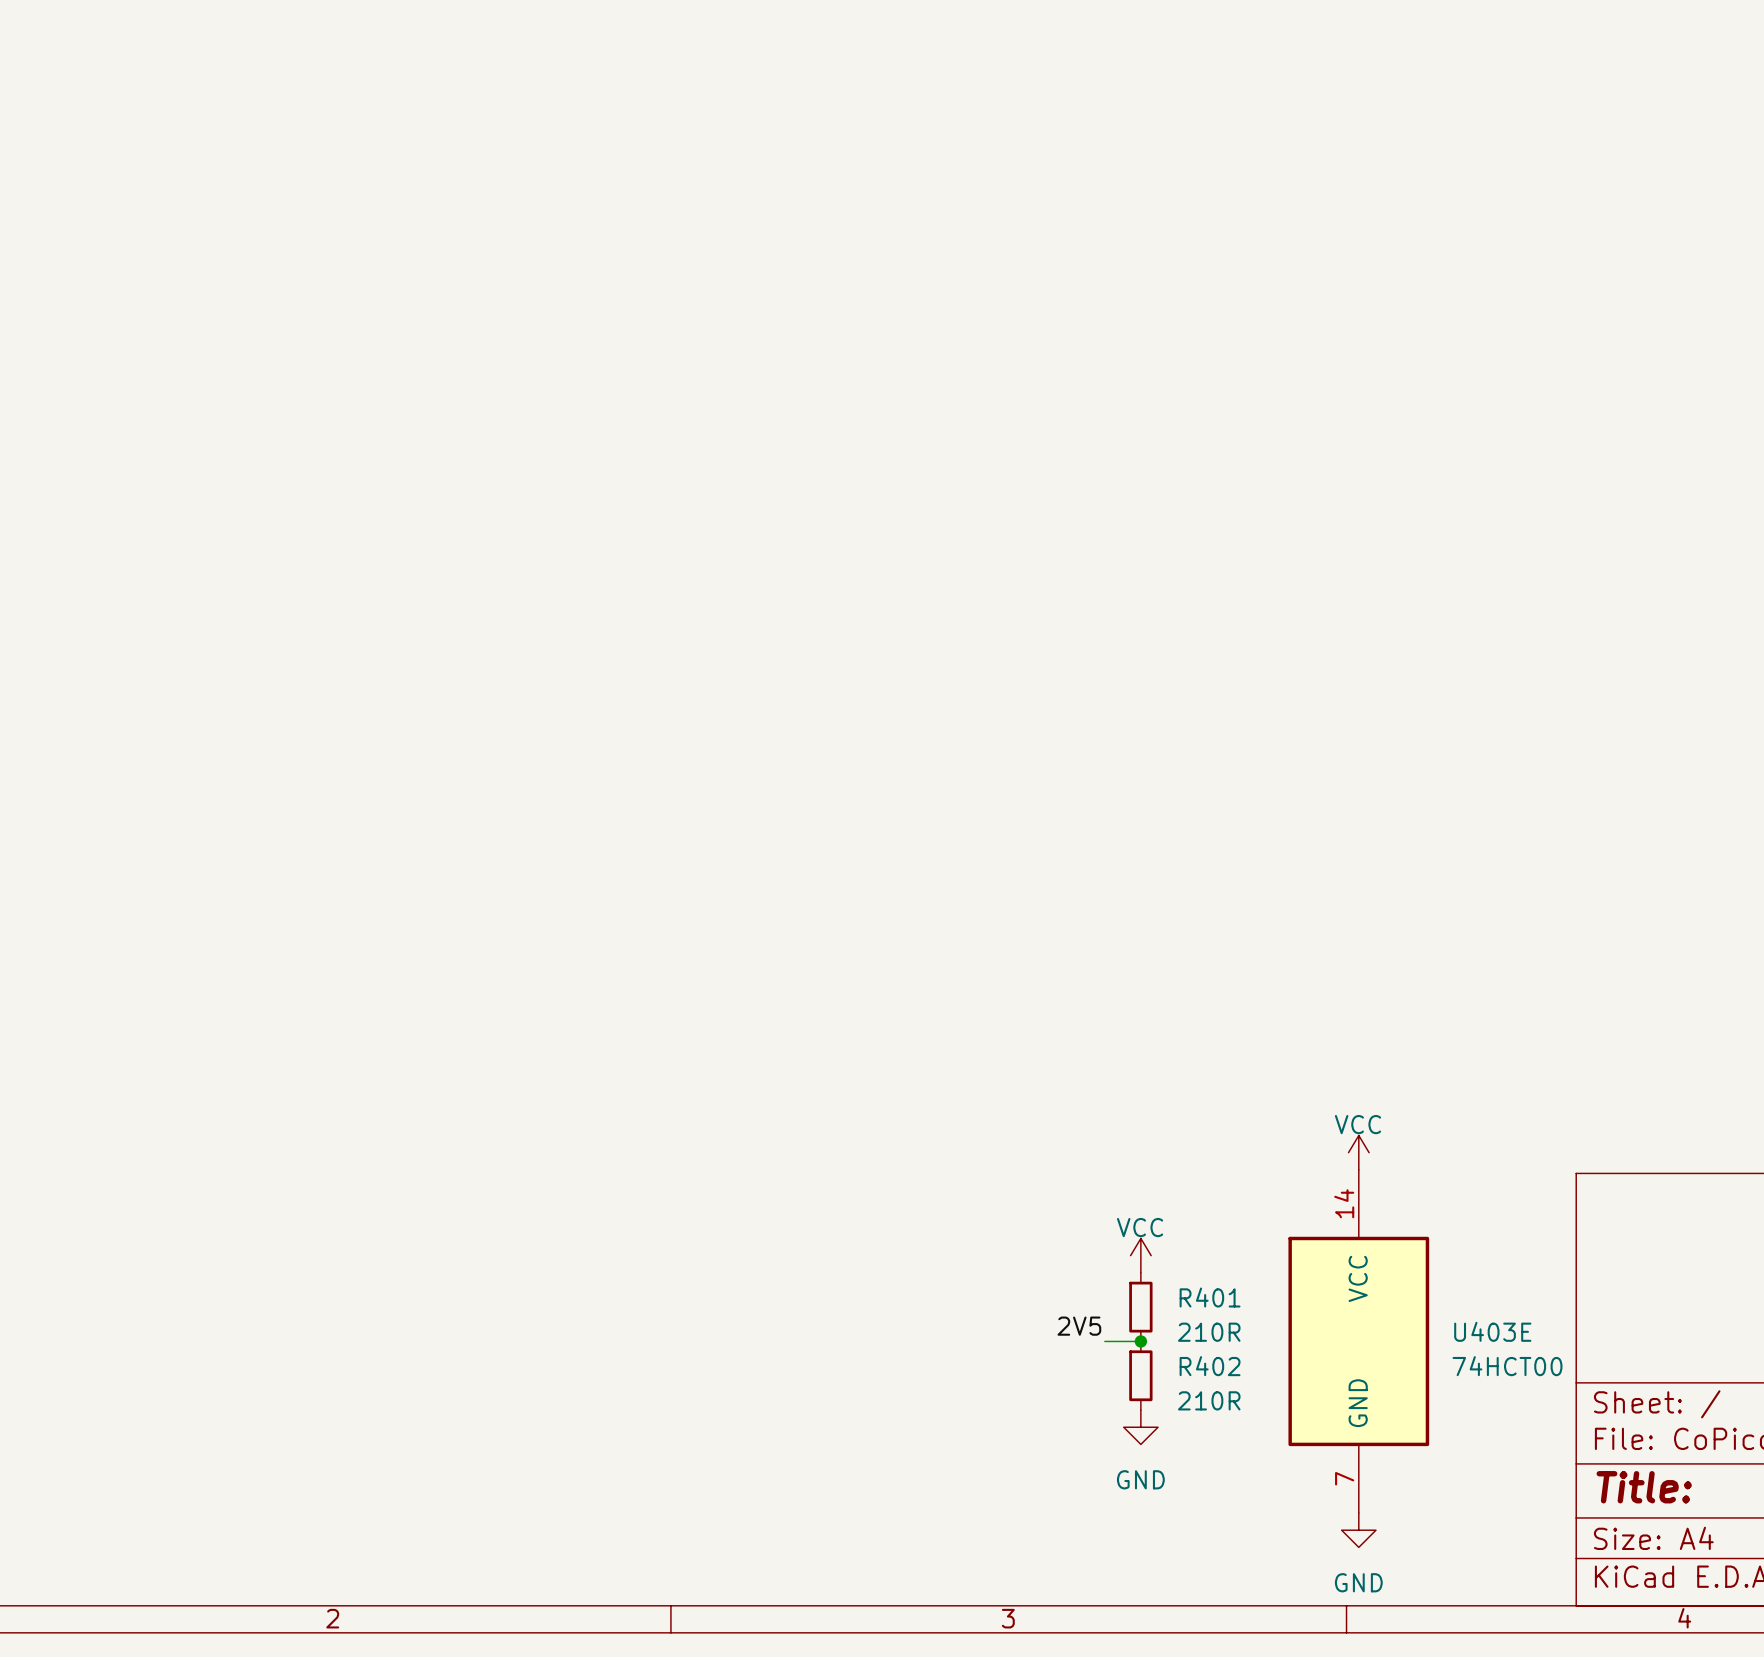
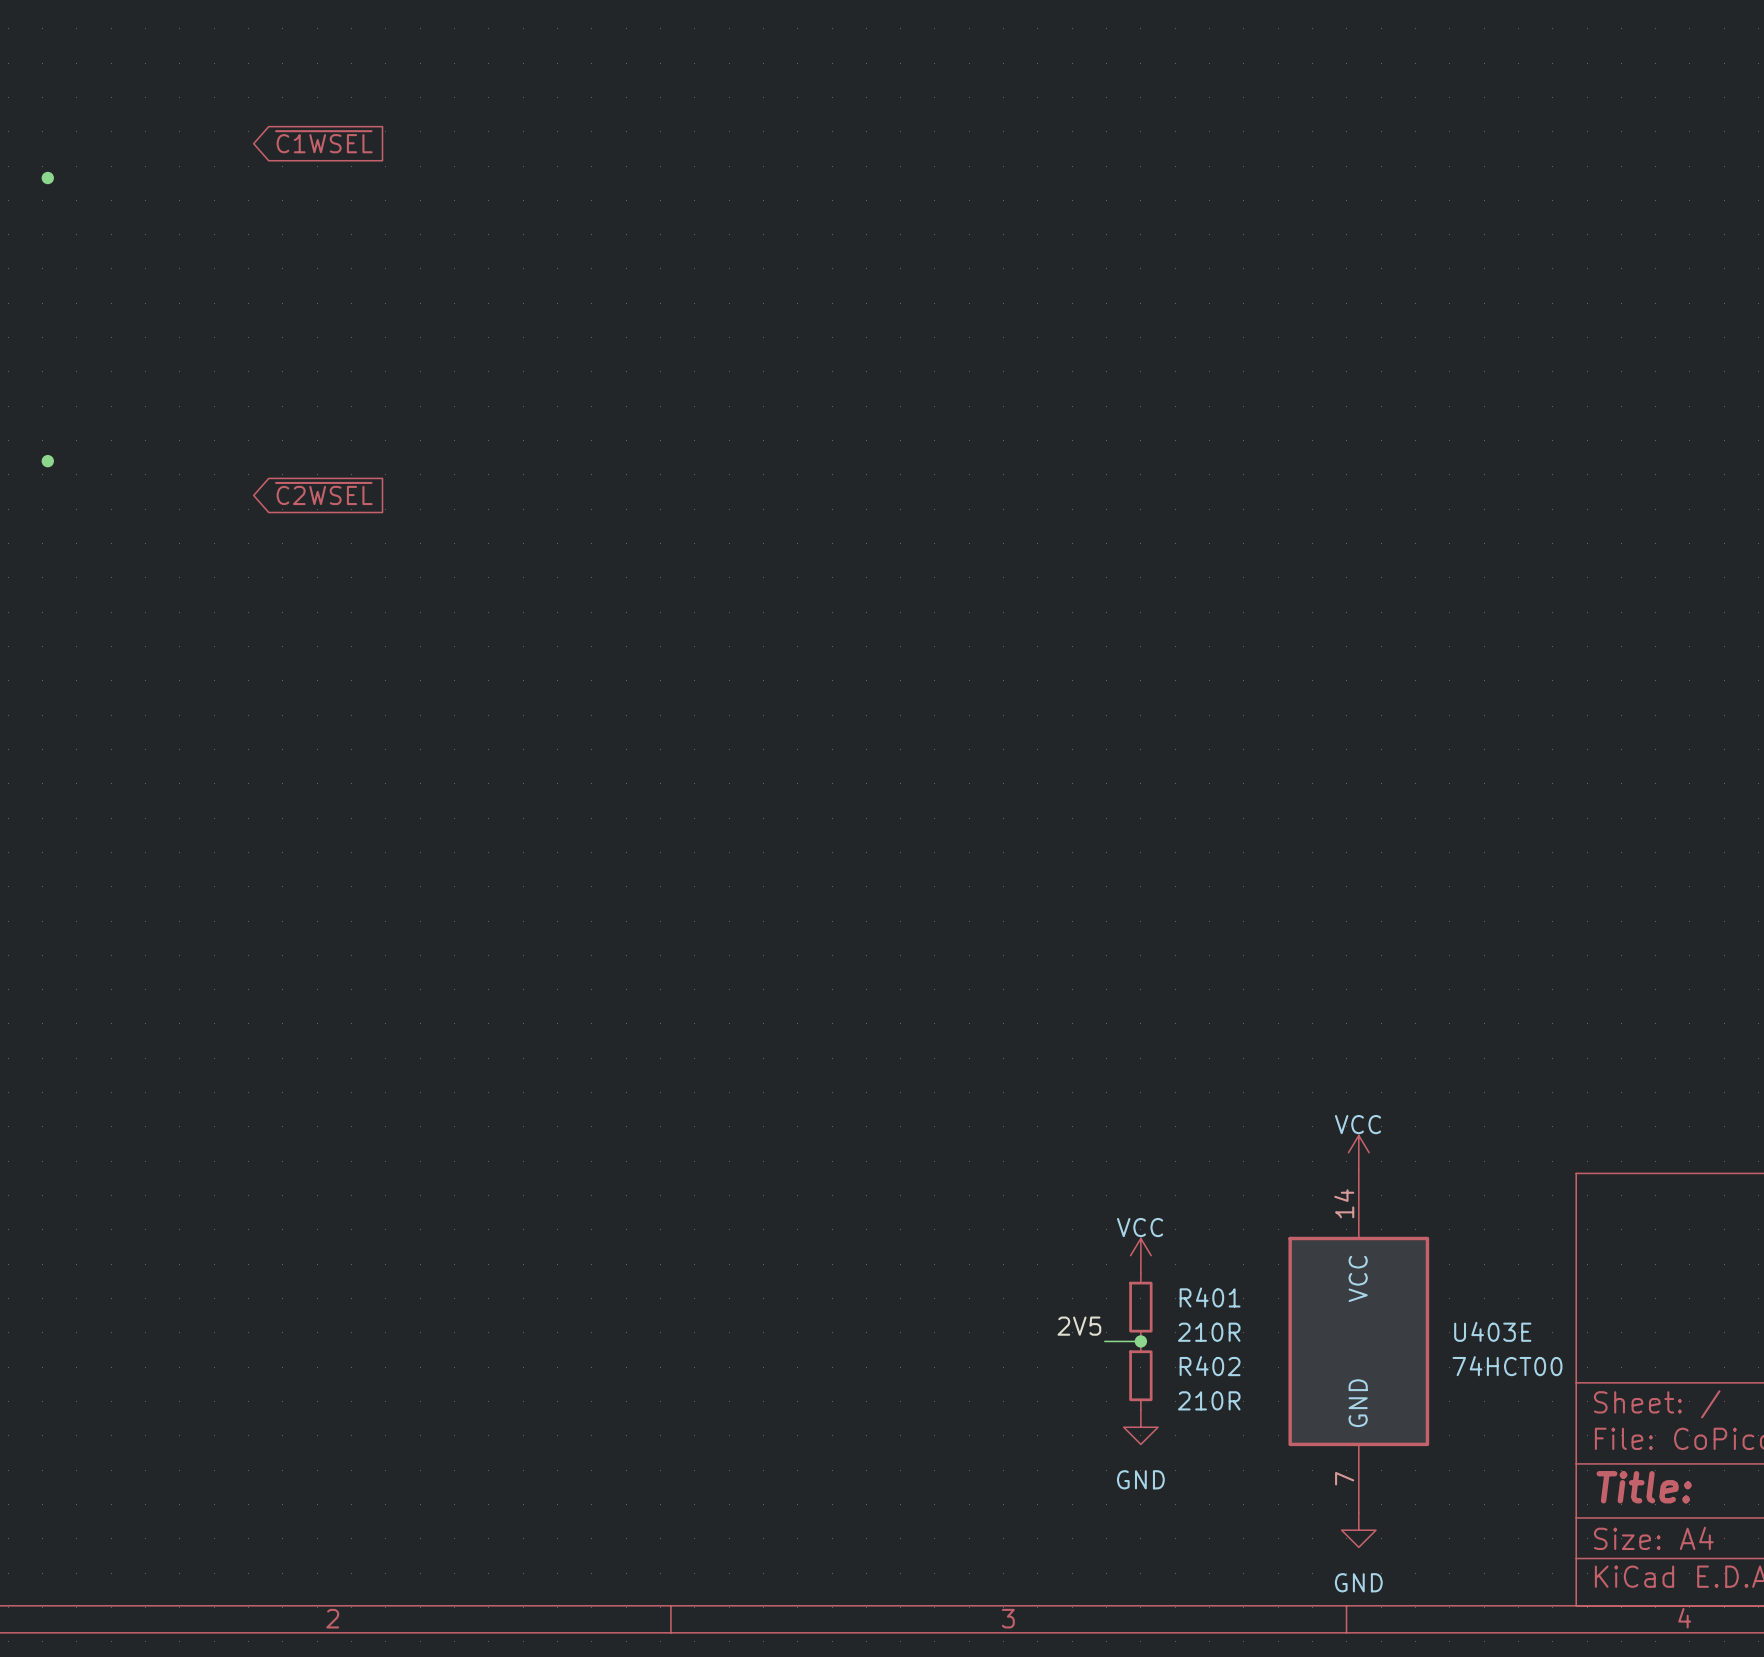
global label: none -> ~{C1WSEL} (323, 141)
junction: none -> (47, 178)
junction: none -> (47, 461)
global label: none -> ~{C2WSEL} (323, 493)

